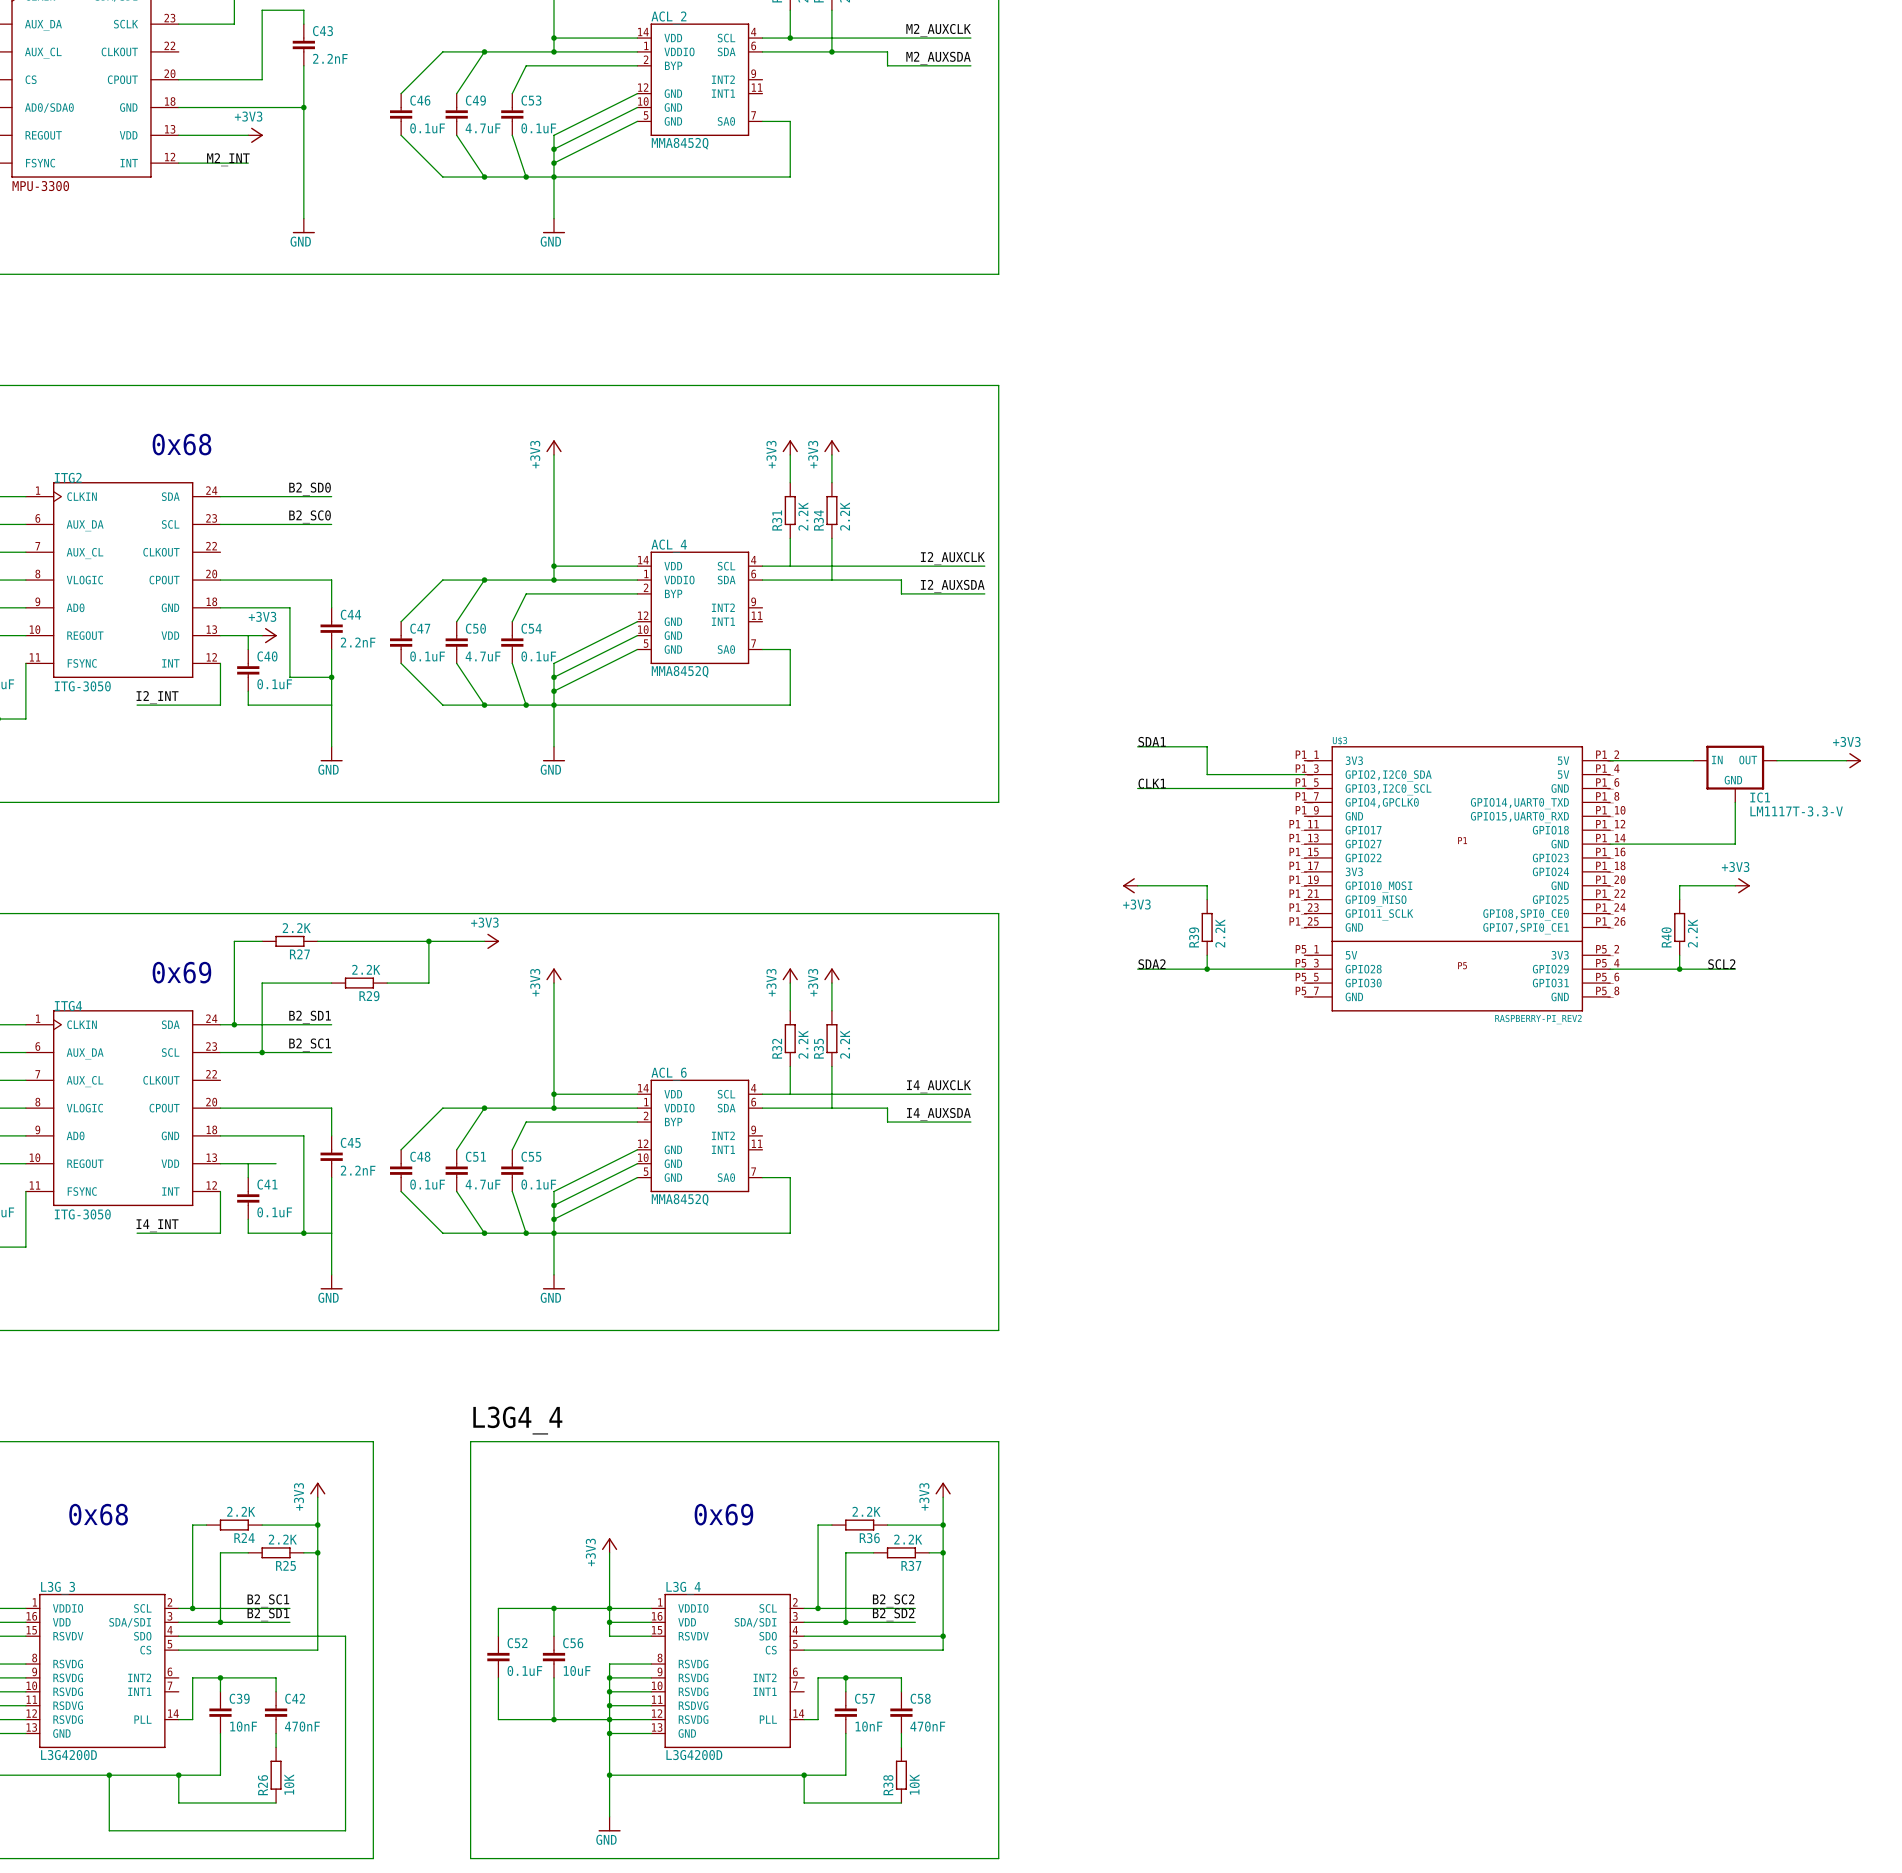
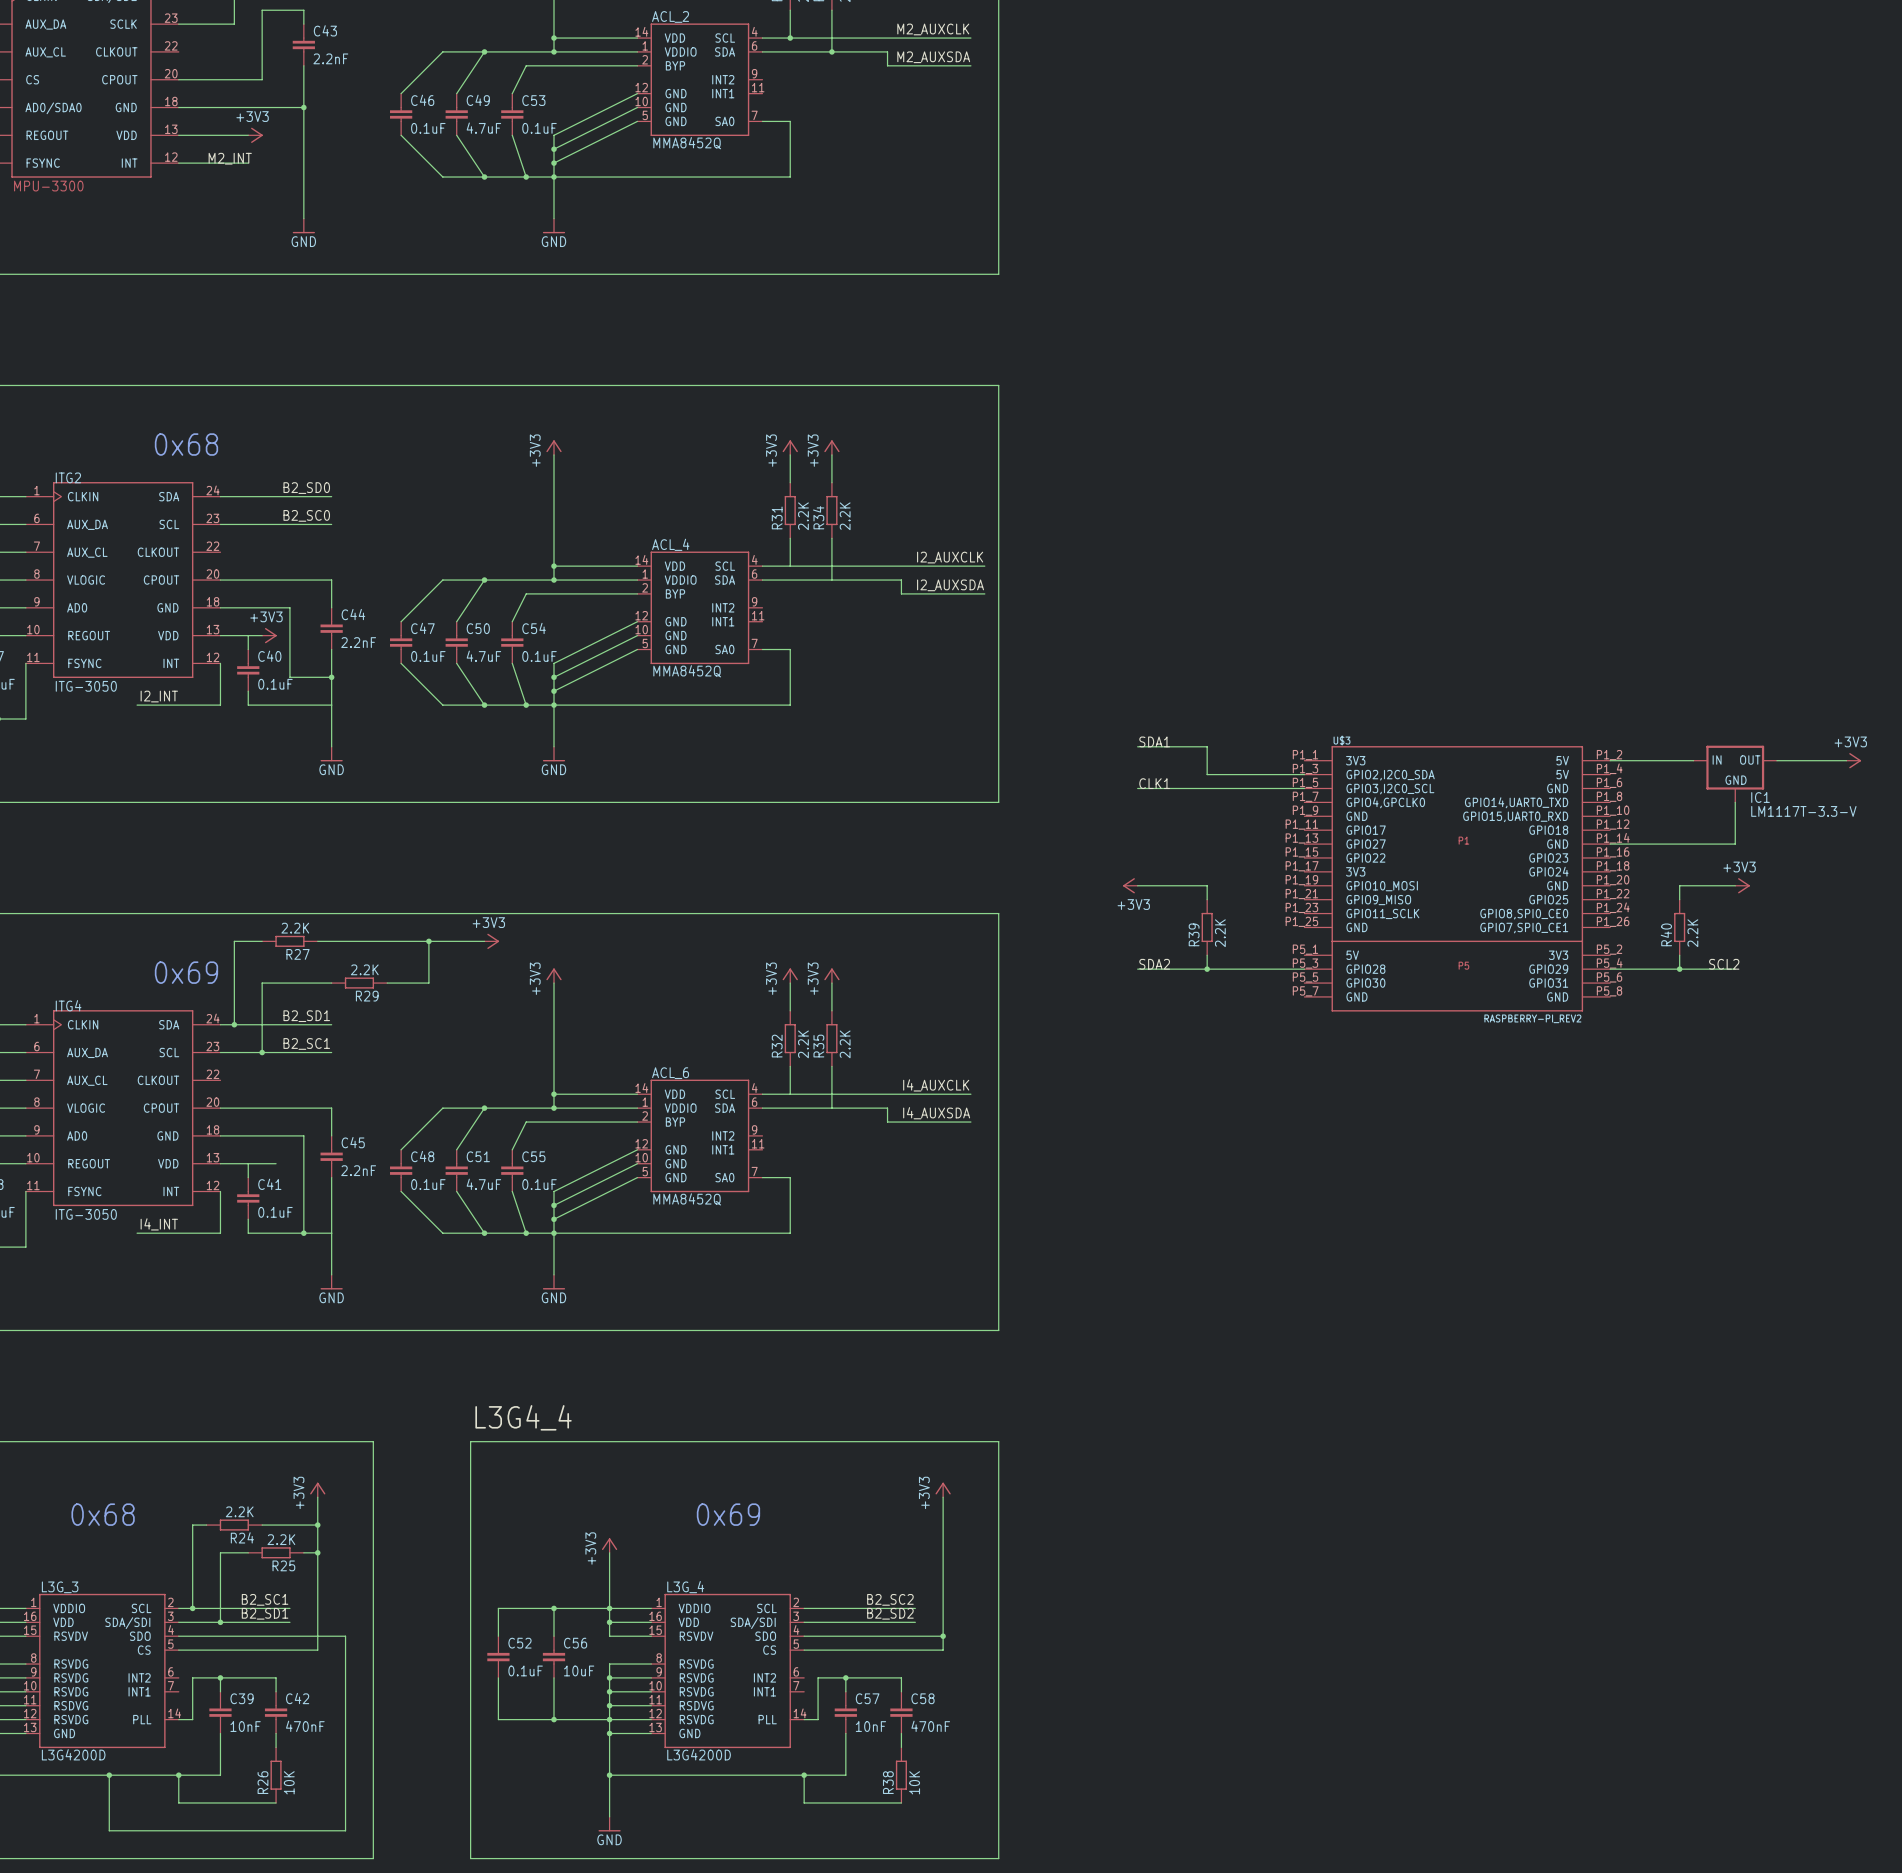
wire: (831, 1525) (818, 1525) (818, 1608) -> none
R36: 2.2K (859, 1525) -> none
wire: (887, 1525) (943, 1525) -> none
junction: (943, 1525) -> none
wire: (873, 1552) (845, 1552) (845, 1622) -> none
R37: 2.2K (901, 1552) -> none
wire: (929, 1552) (943, 1552) -> none
junction: (943, 1552) -> none
junction: (818, 1608) -> none
junction: (845, 1622) -> none

